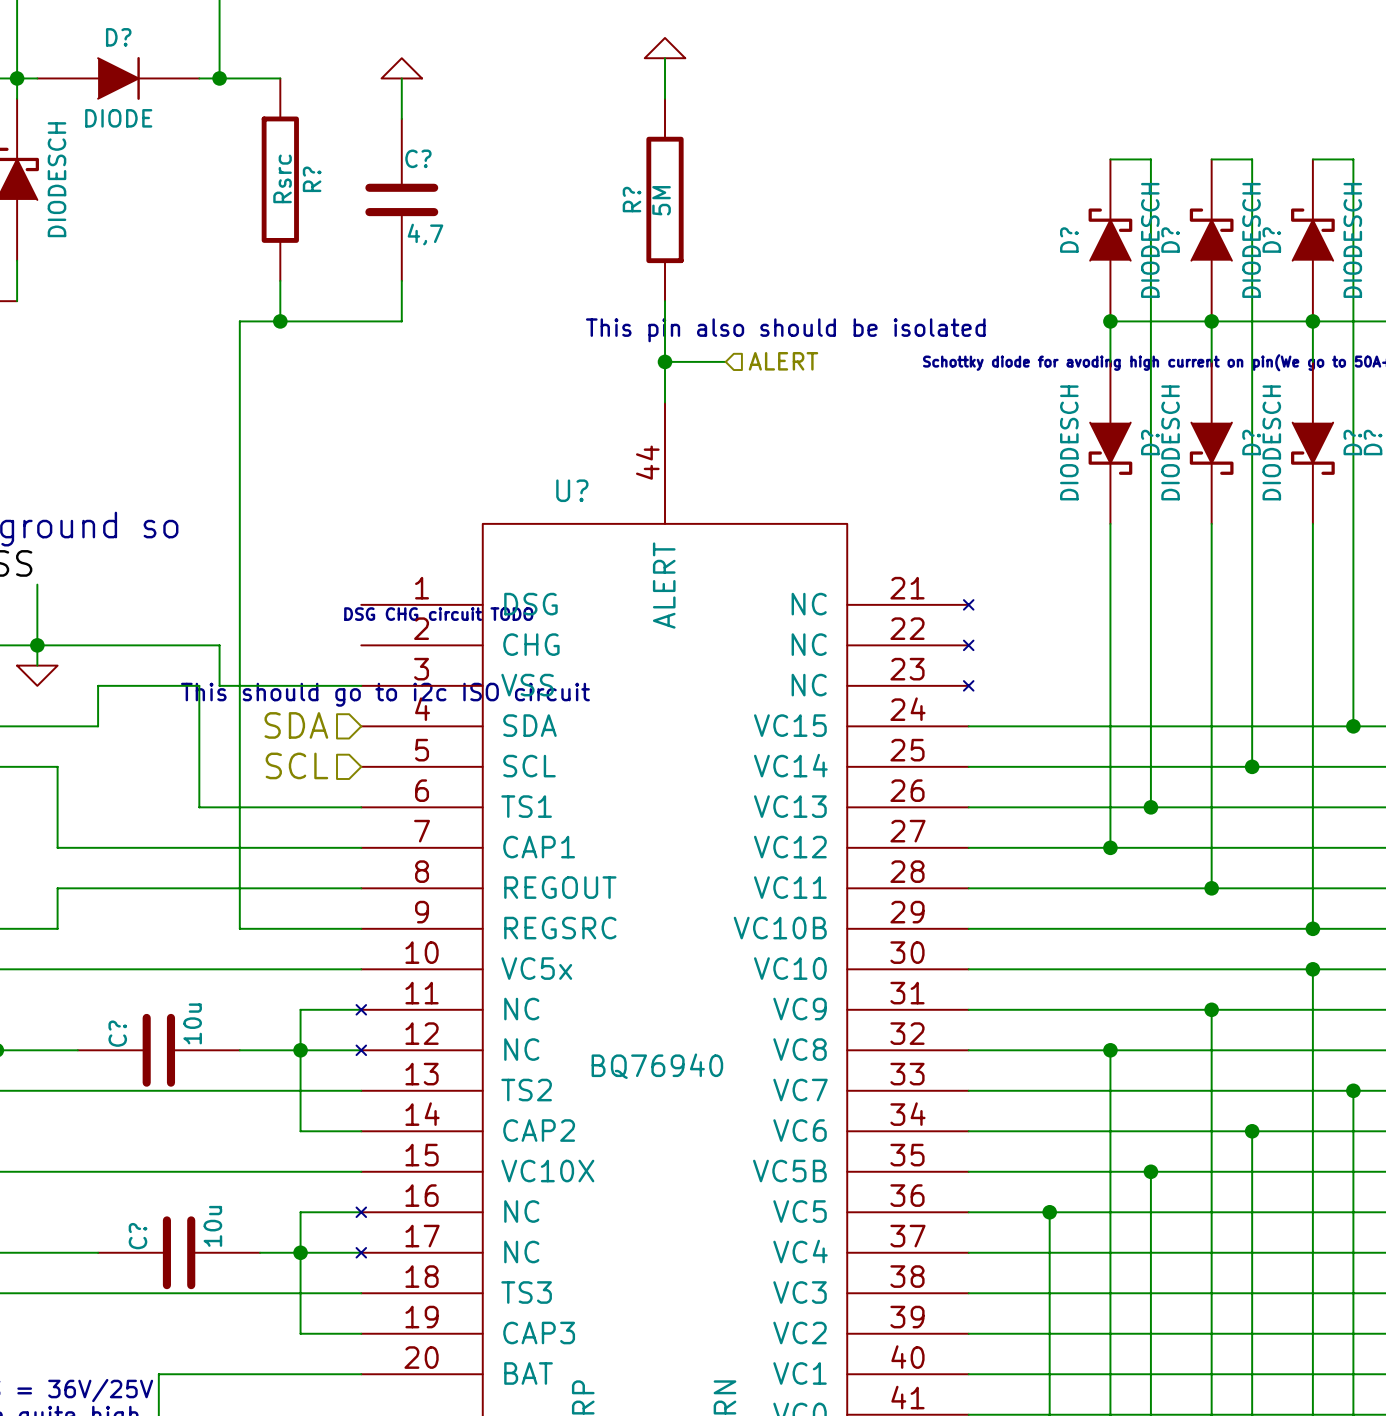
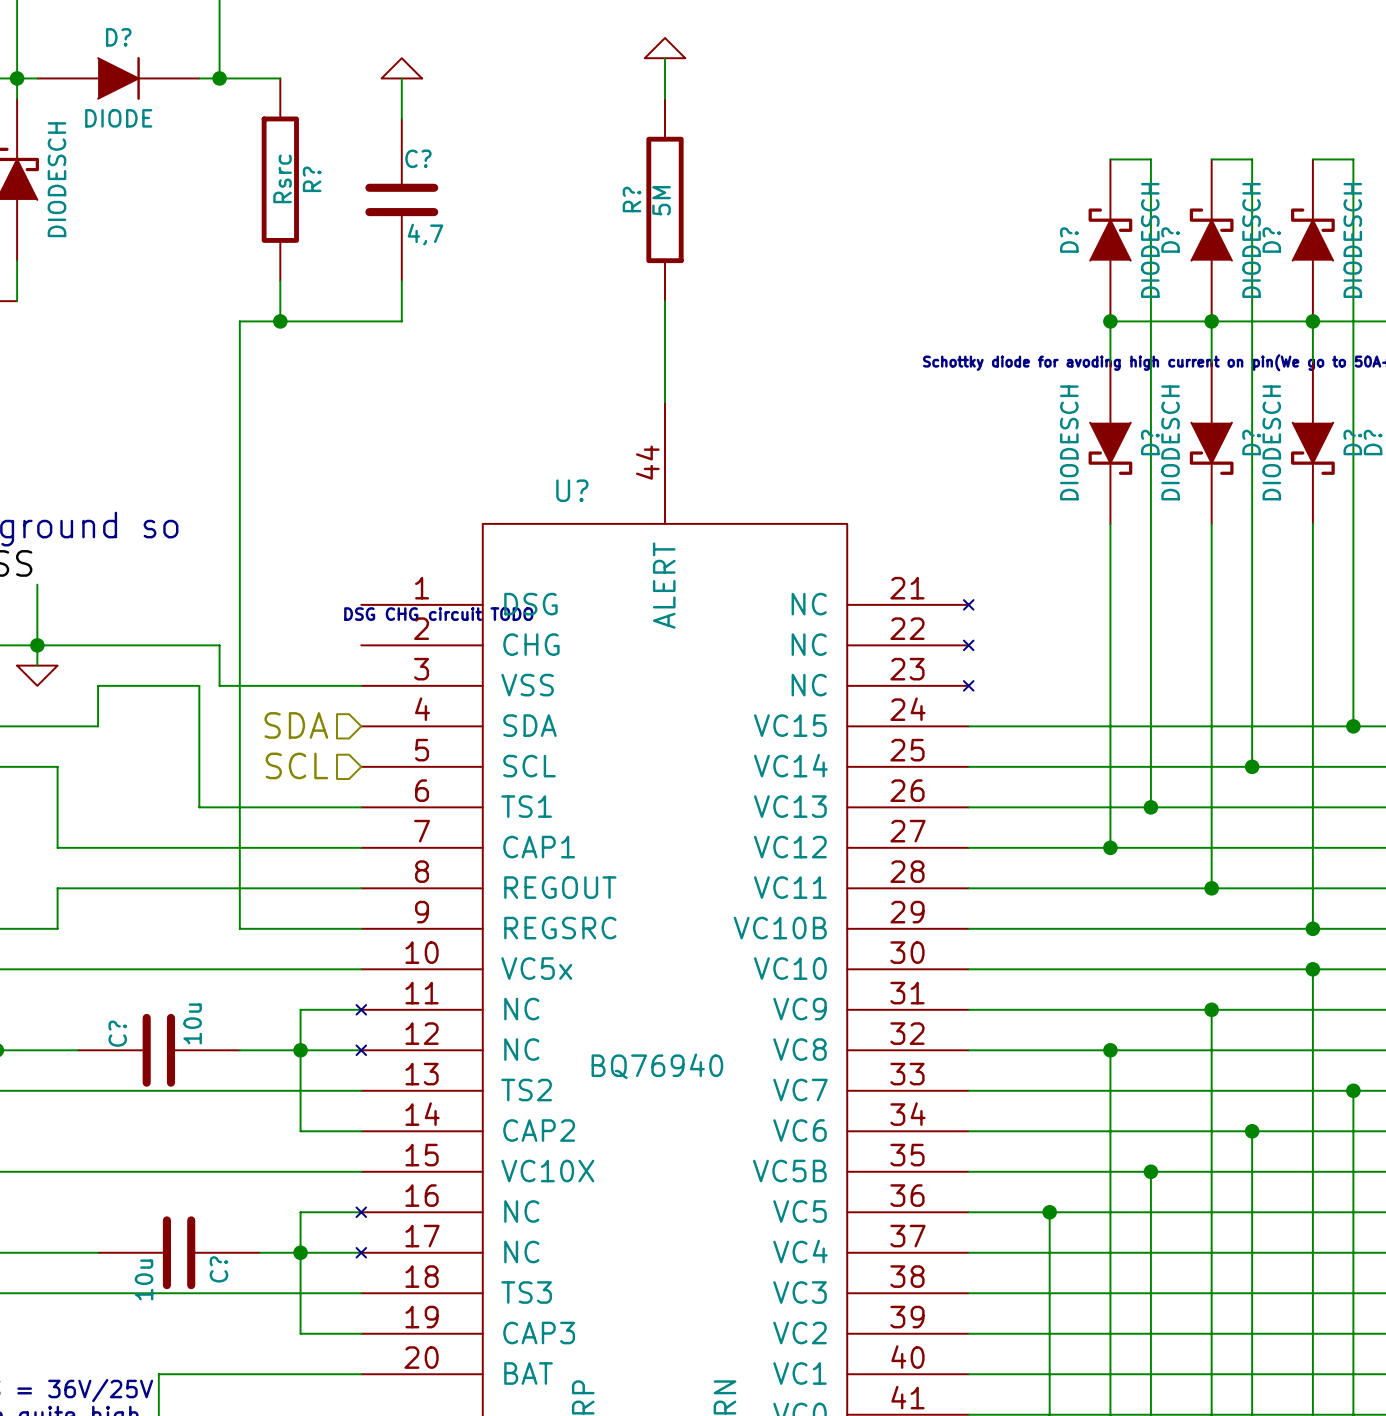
text: This pin also should be isolated (785, 330) -> none
wire: (665, 361) (725, 361) -> none
junction: (665, 361) -> none
hierarchical label: ALERT (783, 361) -> none
text: This should go to i2c ISO circuit (385, 694) -> none
C? value position: 10u (212, 1226) -> 10u (144, 1279)
C? name position: C? (137, 1236) -> C? (218, 1269)

